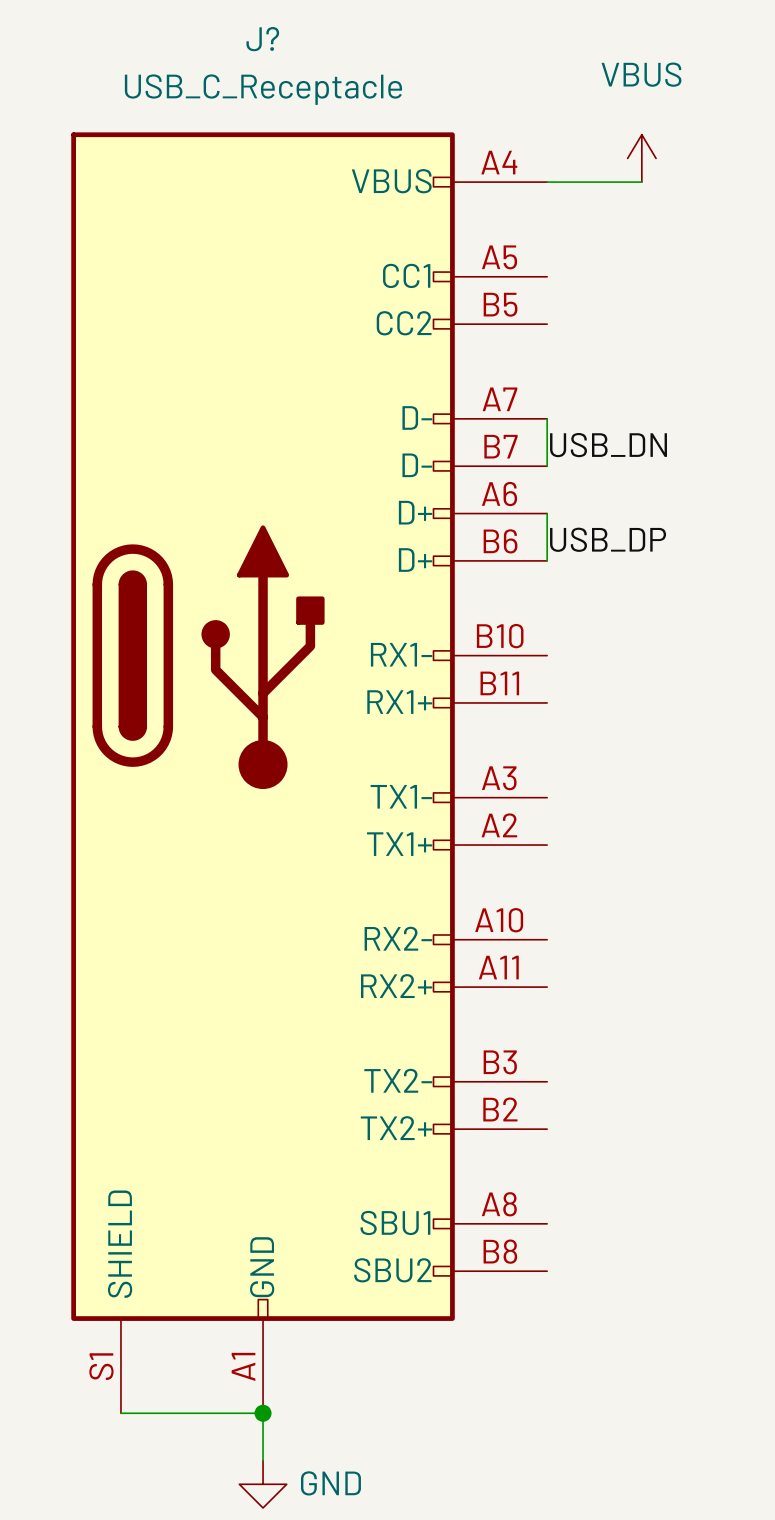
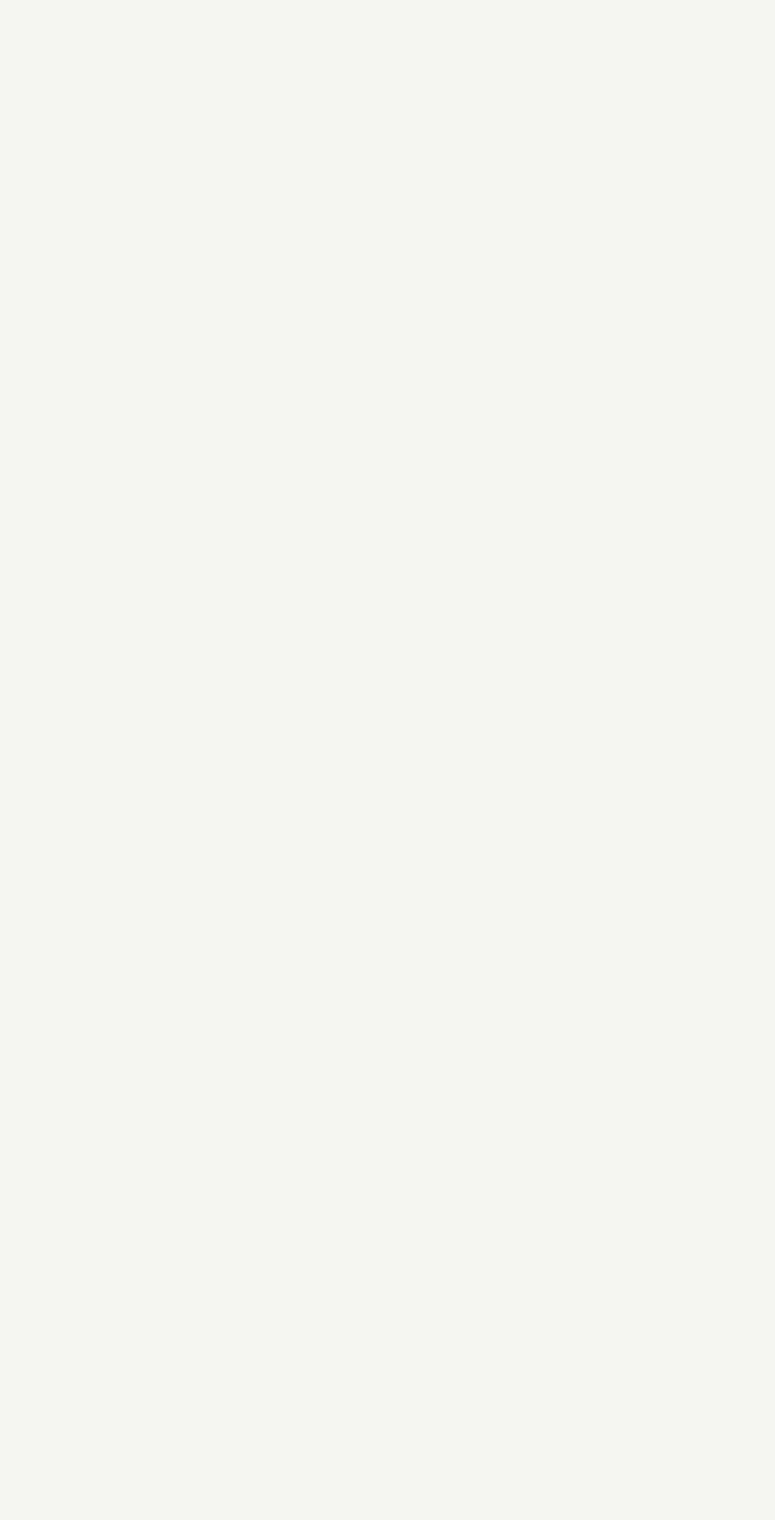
power symbol: VBUS (641, 158) -> none
wire: (547, 182) (641, 182) -> none
wire: (547, 418) (547, 466) -> none
label: USB_DN (608, 445) -> none
wire: (547, 513) (547, 560) -> none
label: USB_DP (608, 539) -> none
J?: USB_C_Receptacle (309, 772) -> none
wire: (120, 1413) (263, 1413) (263, 1460) -> none
junction: (263, 1413) -> none
power symbol: GND (263, 1484) -> none

